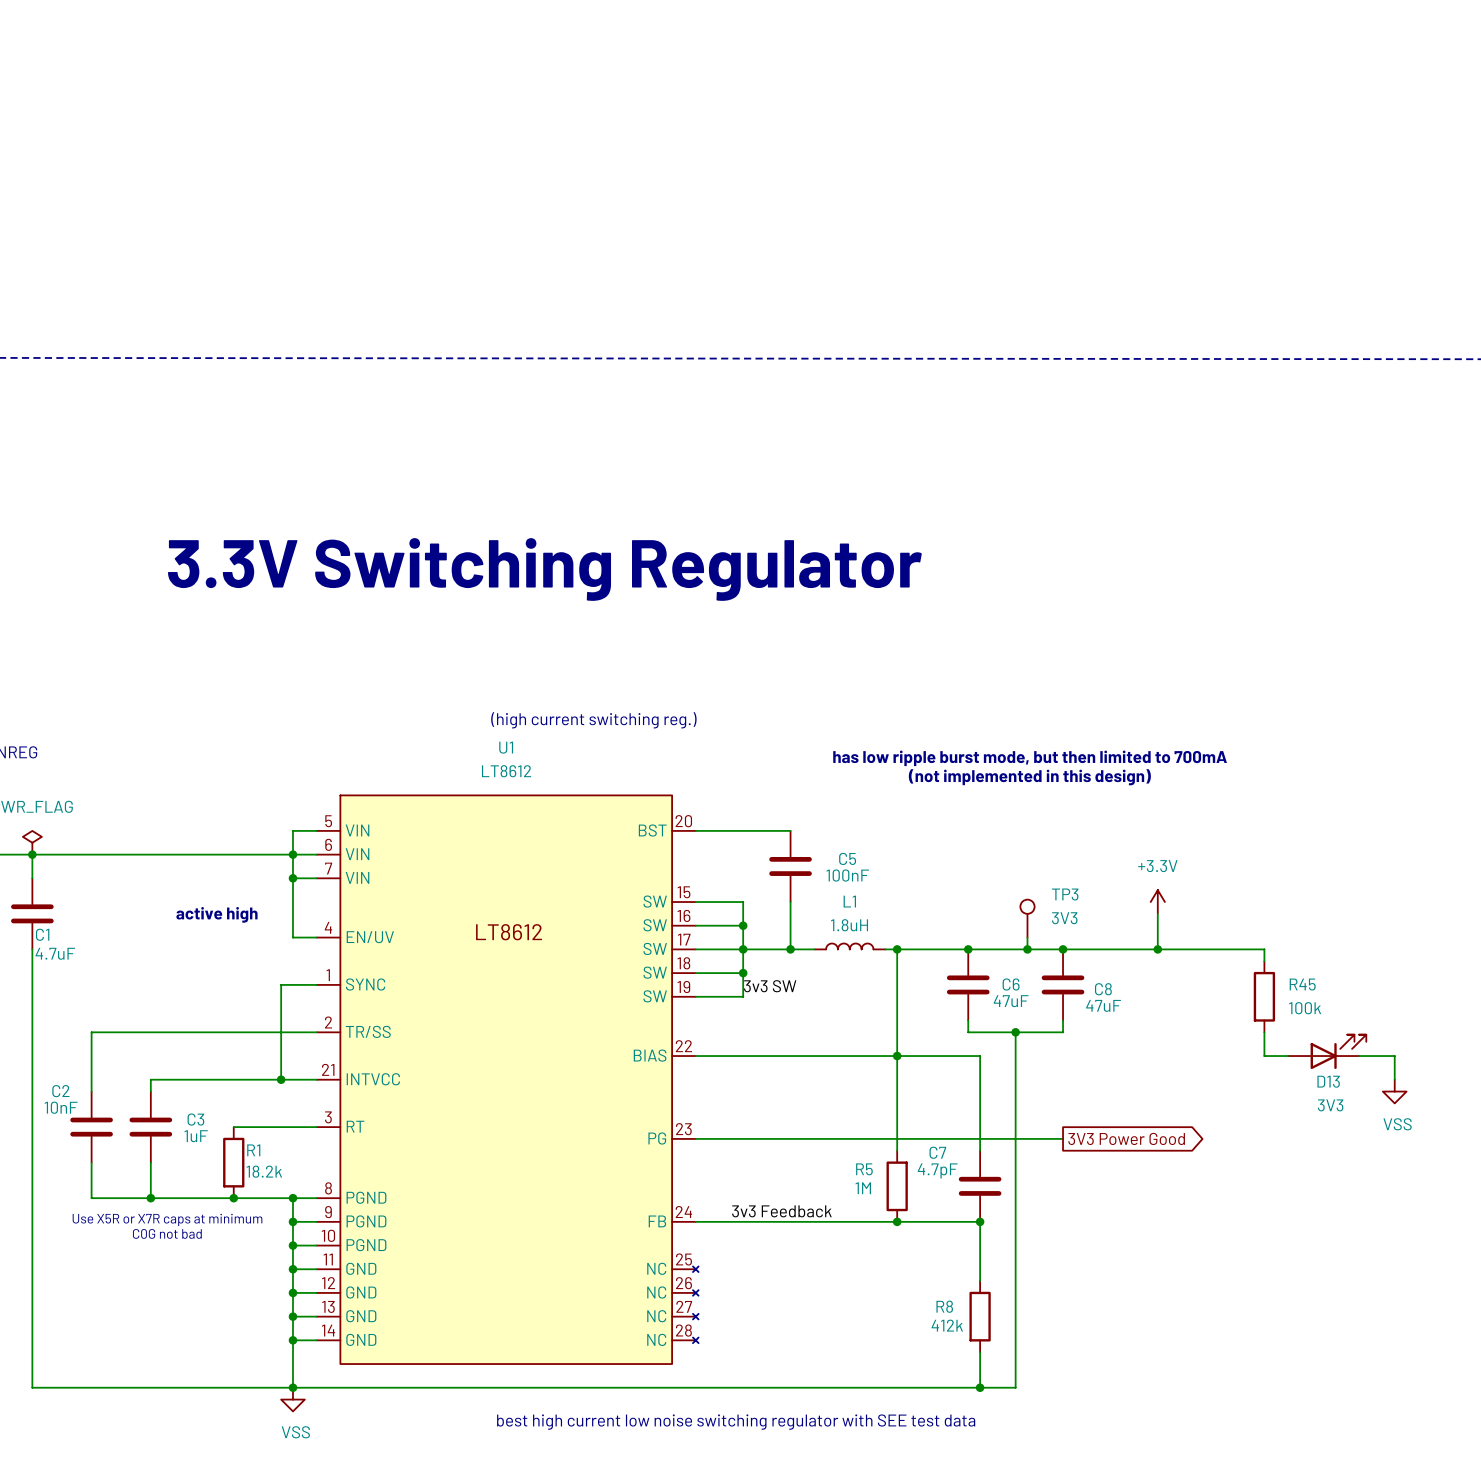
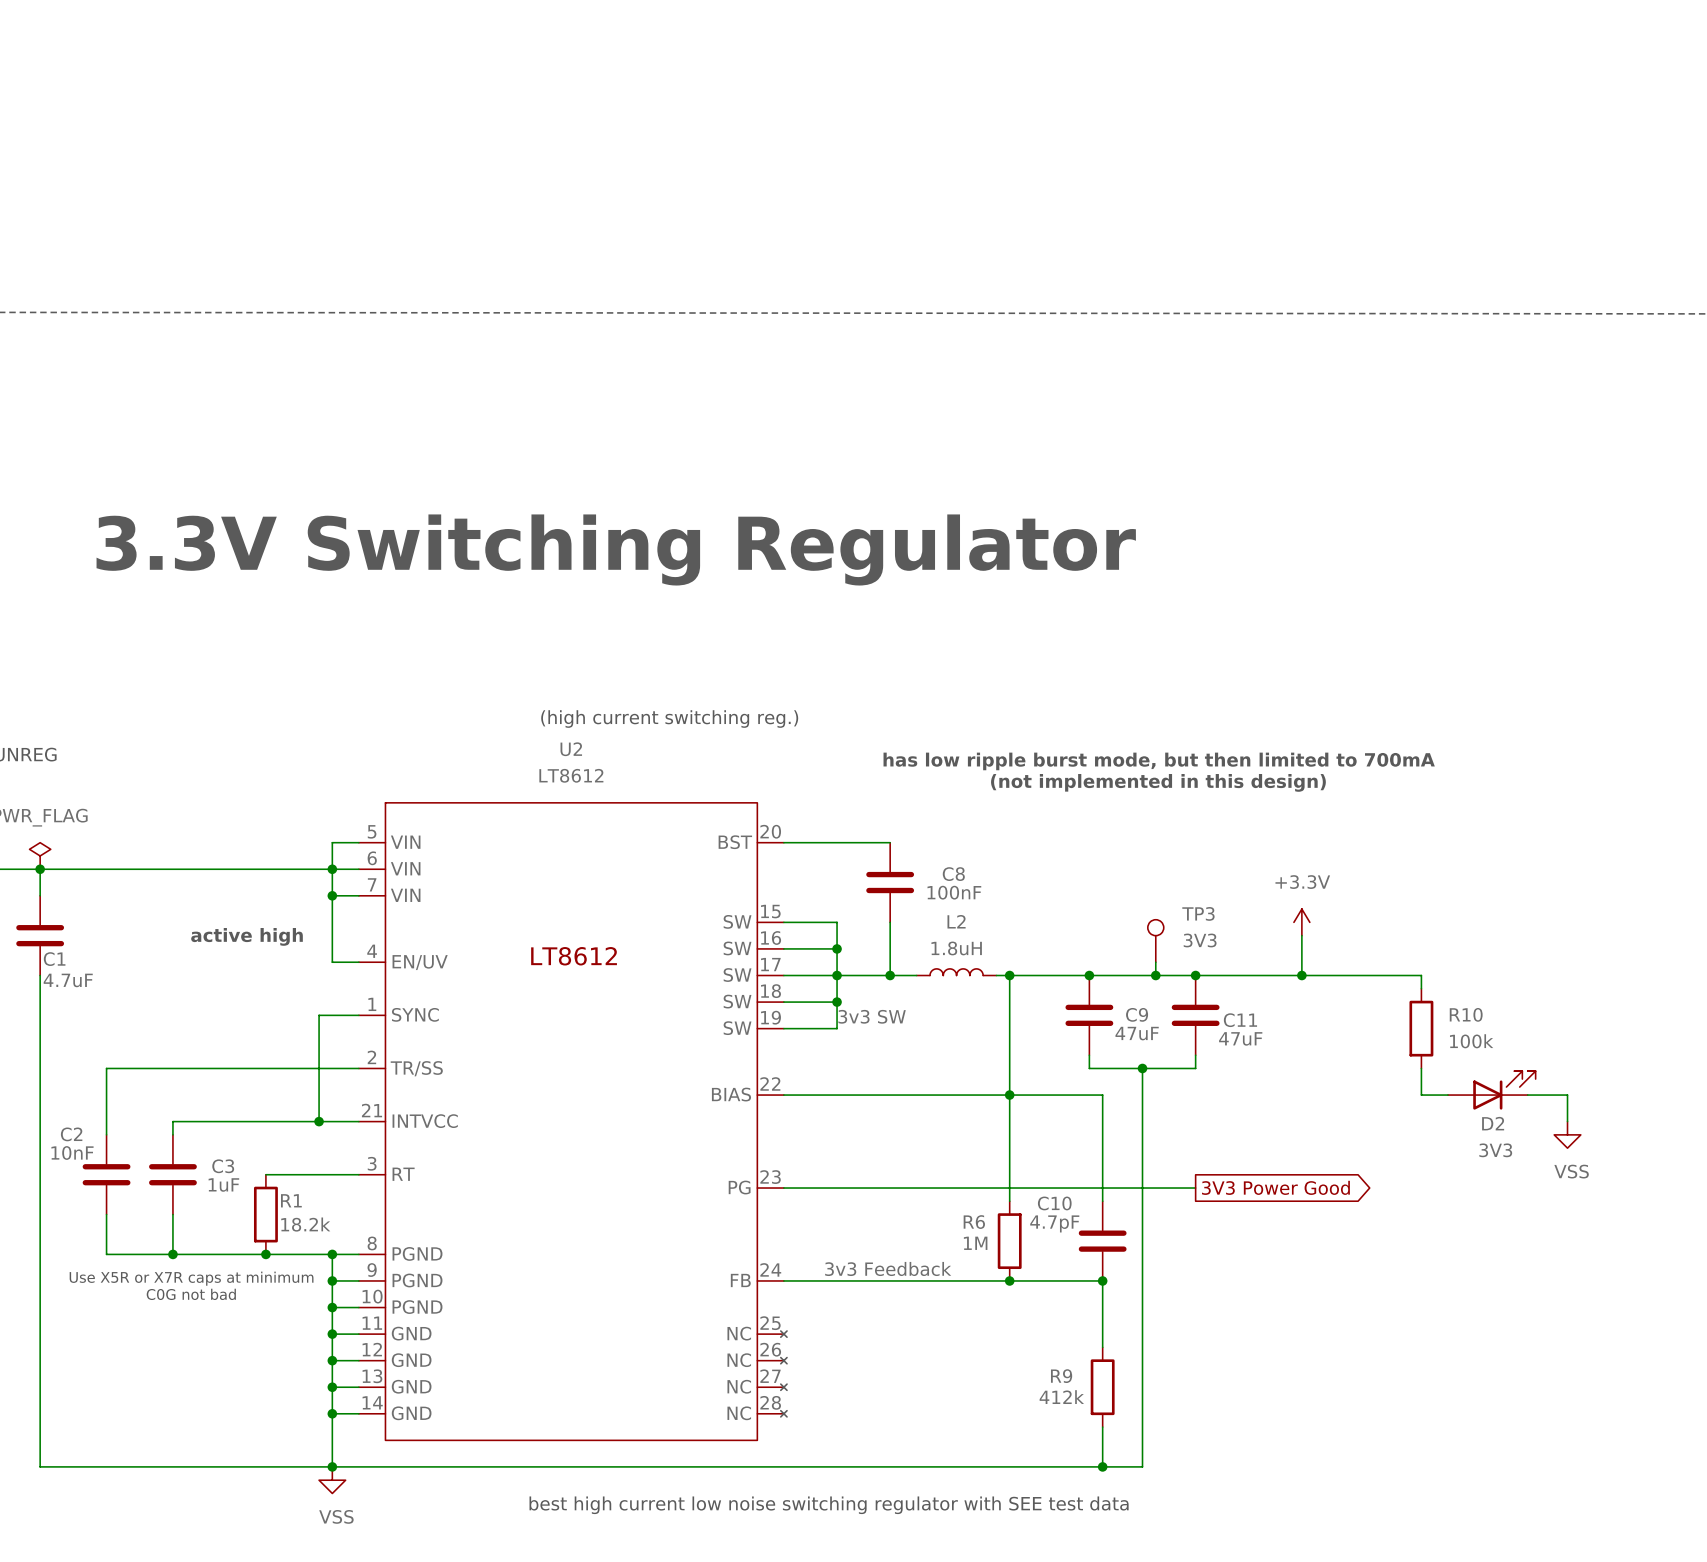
U1 name: U1 (506, 747) -> U2 (571, 749)
C5 name: C5 (847, 858) -> C8 (953, 874)
L1 name: L1 (849, 901) -> L2 (956, 921)
C6 name: C6 (1011, 984) -> C9 (1137, 1014)
R45 name: R45 (1302, 984) -> R10 (1466, 1014)
C8 name: C8 (1103, 989) -> C11 (1240, 1020)
D13 name: D13 (1328, 1081) -> D2 (1493, 1123)
C7 name: C7 (937, 1152) -> C10 (1054, 1203)
R5 name: R5 (864, 1169) -> R6 (974, 1222)
R8 name: R8 (944, 1306) -> R9 (1061, 1376)

